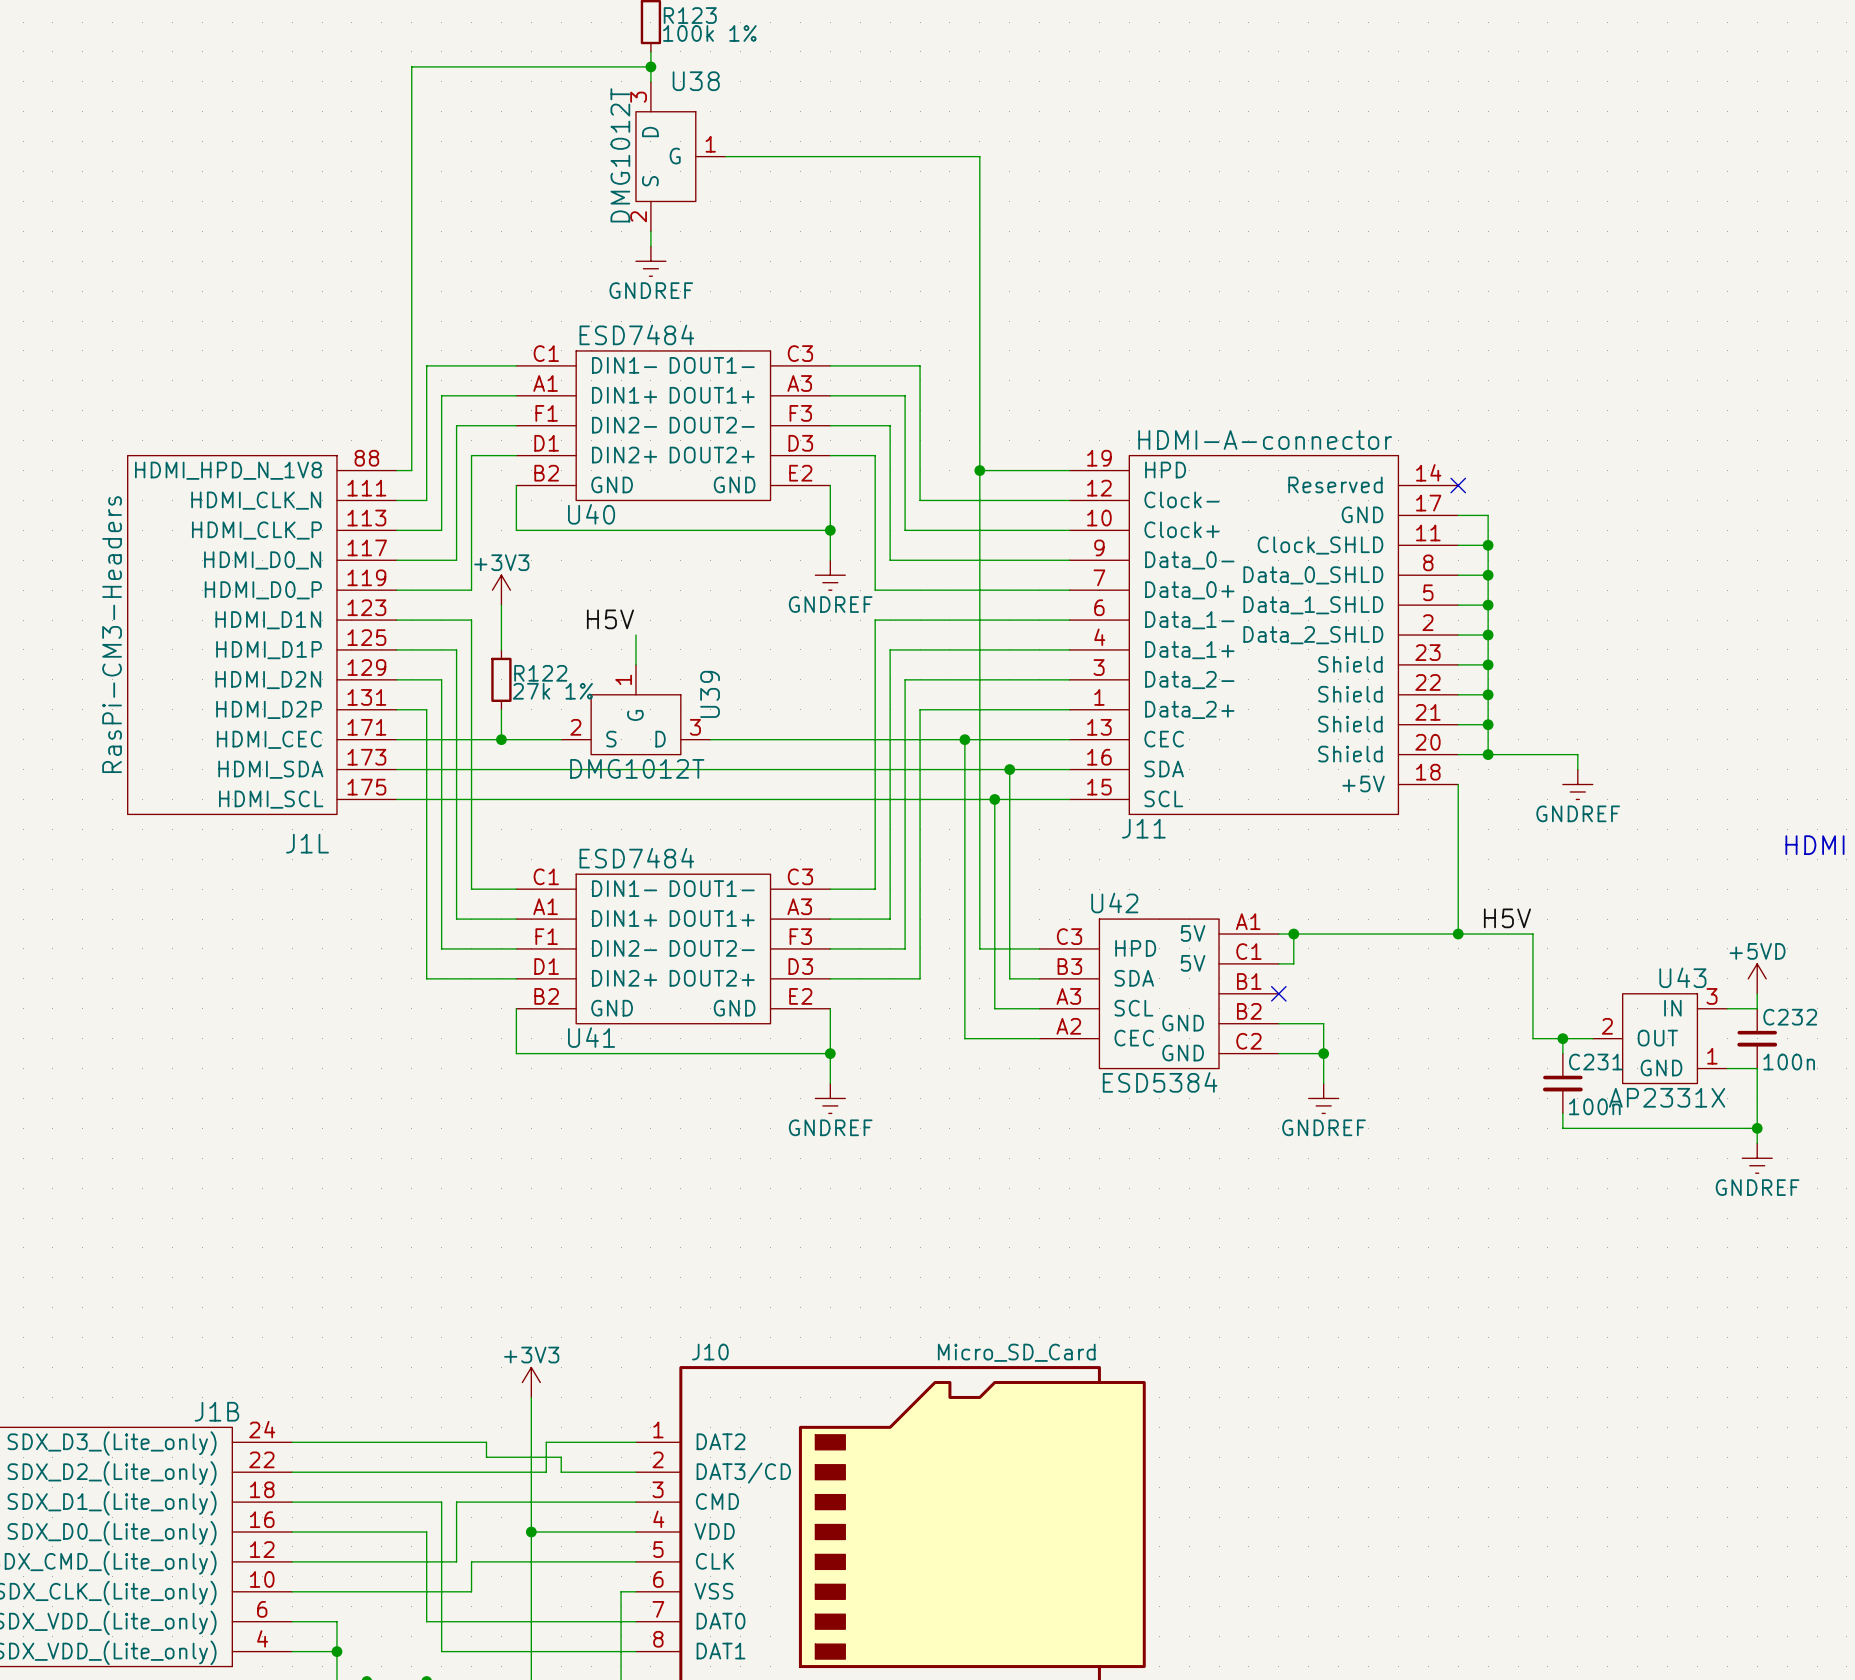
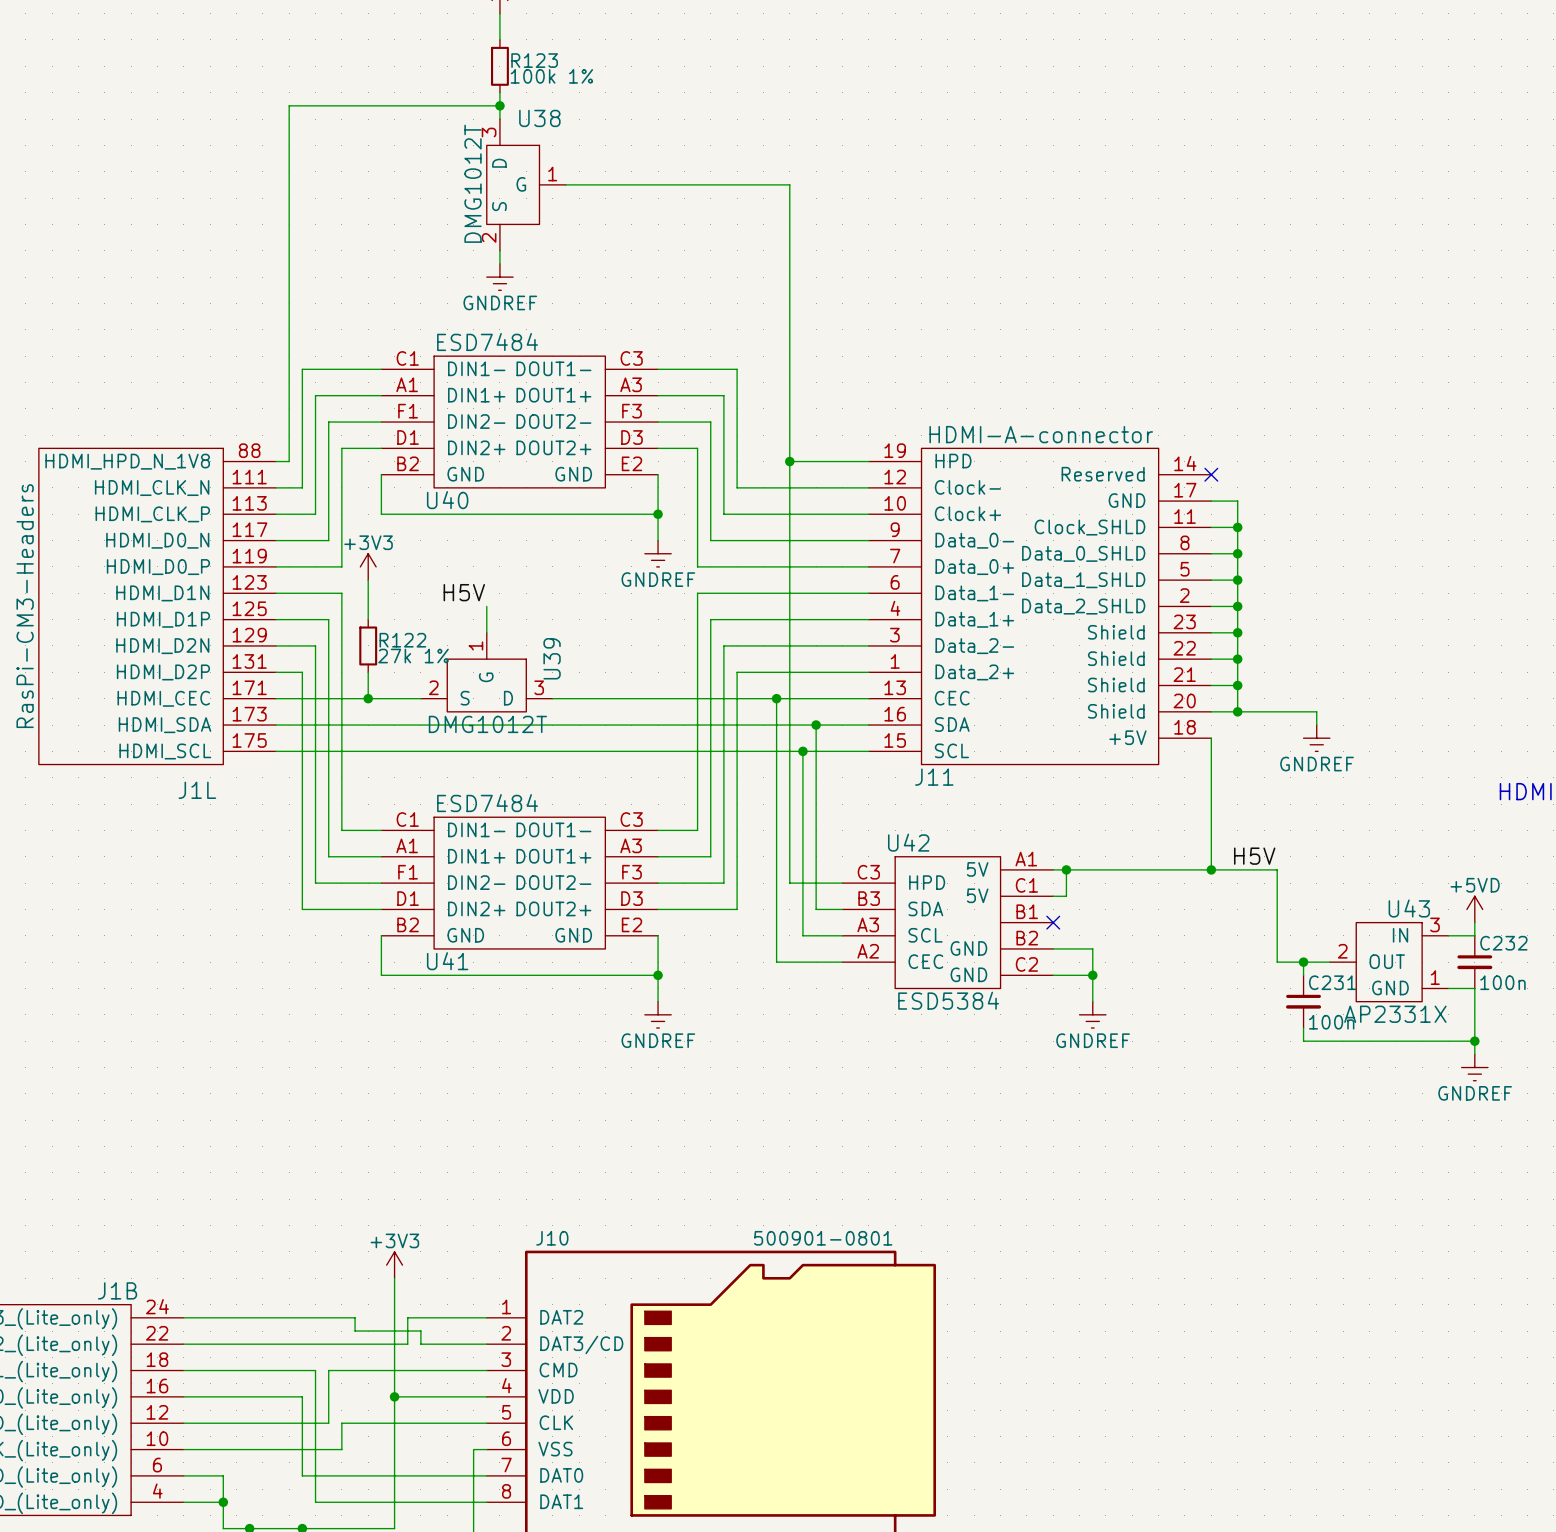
J10 value: Micro_SD_Card (1016, 1352) -> 500901-0801 (823, 1238)

